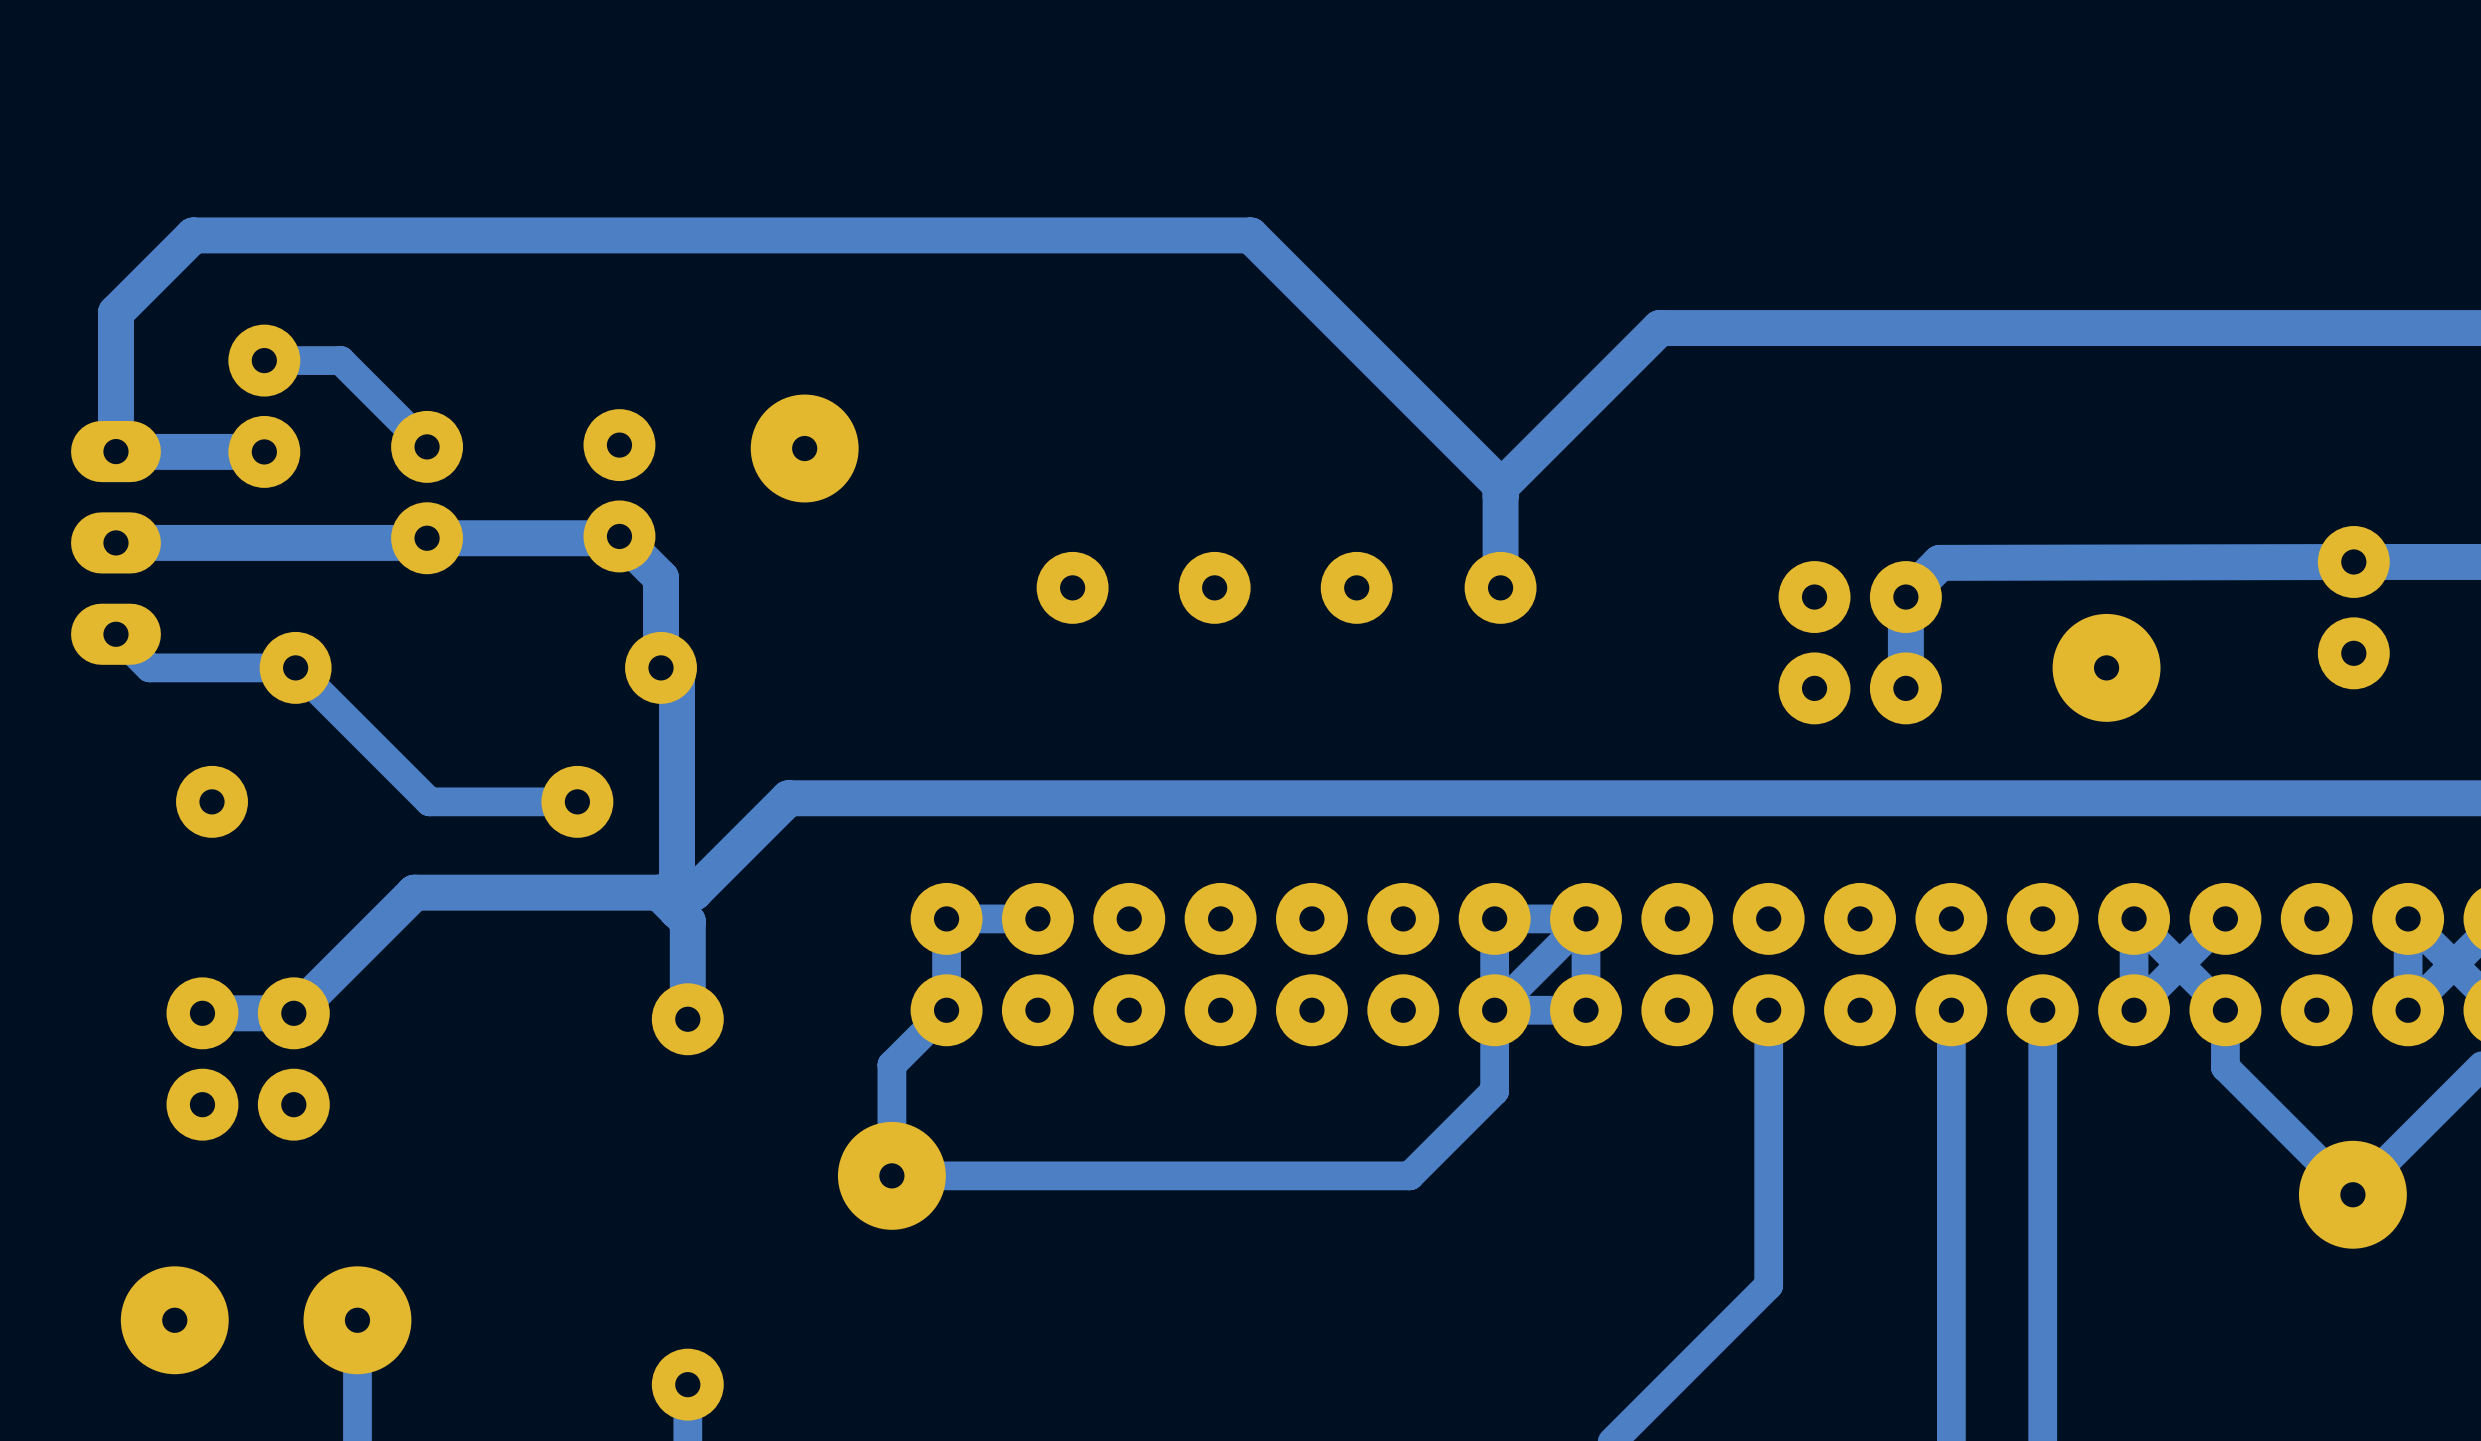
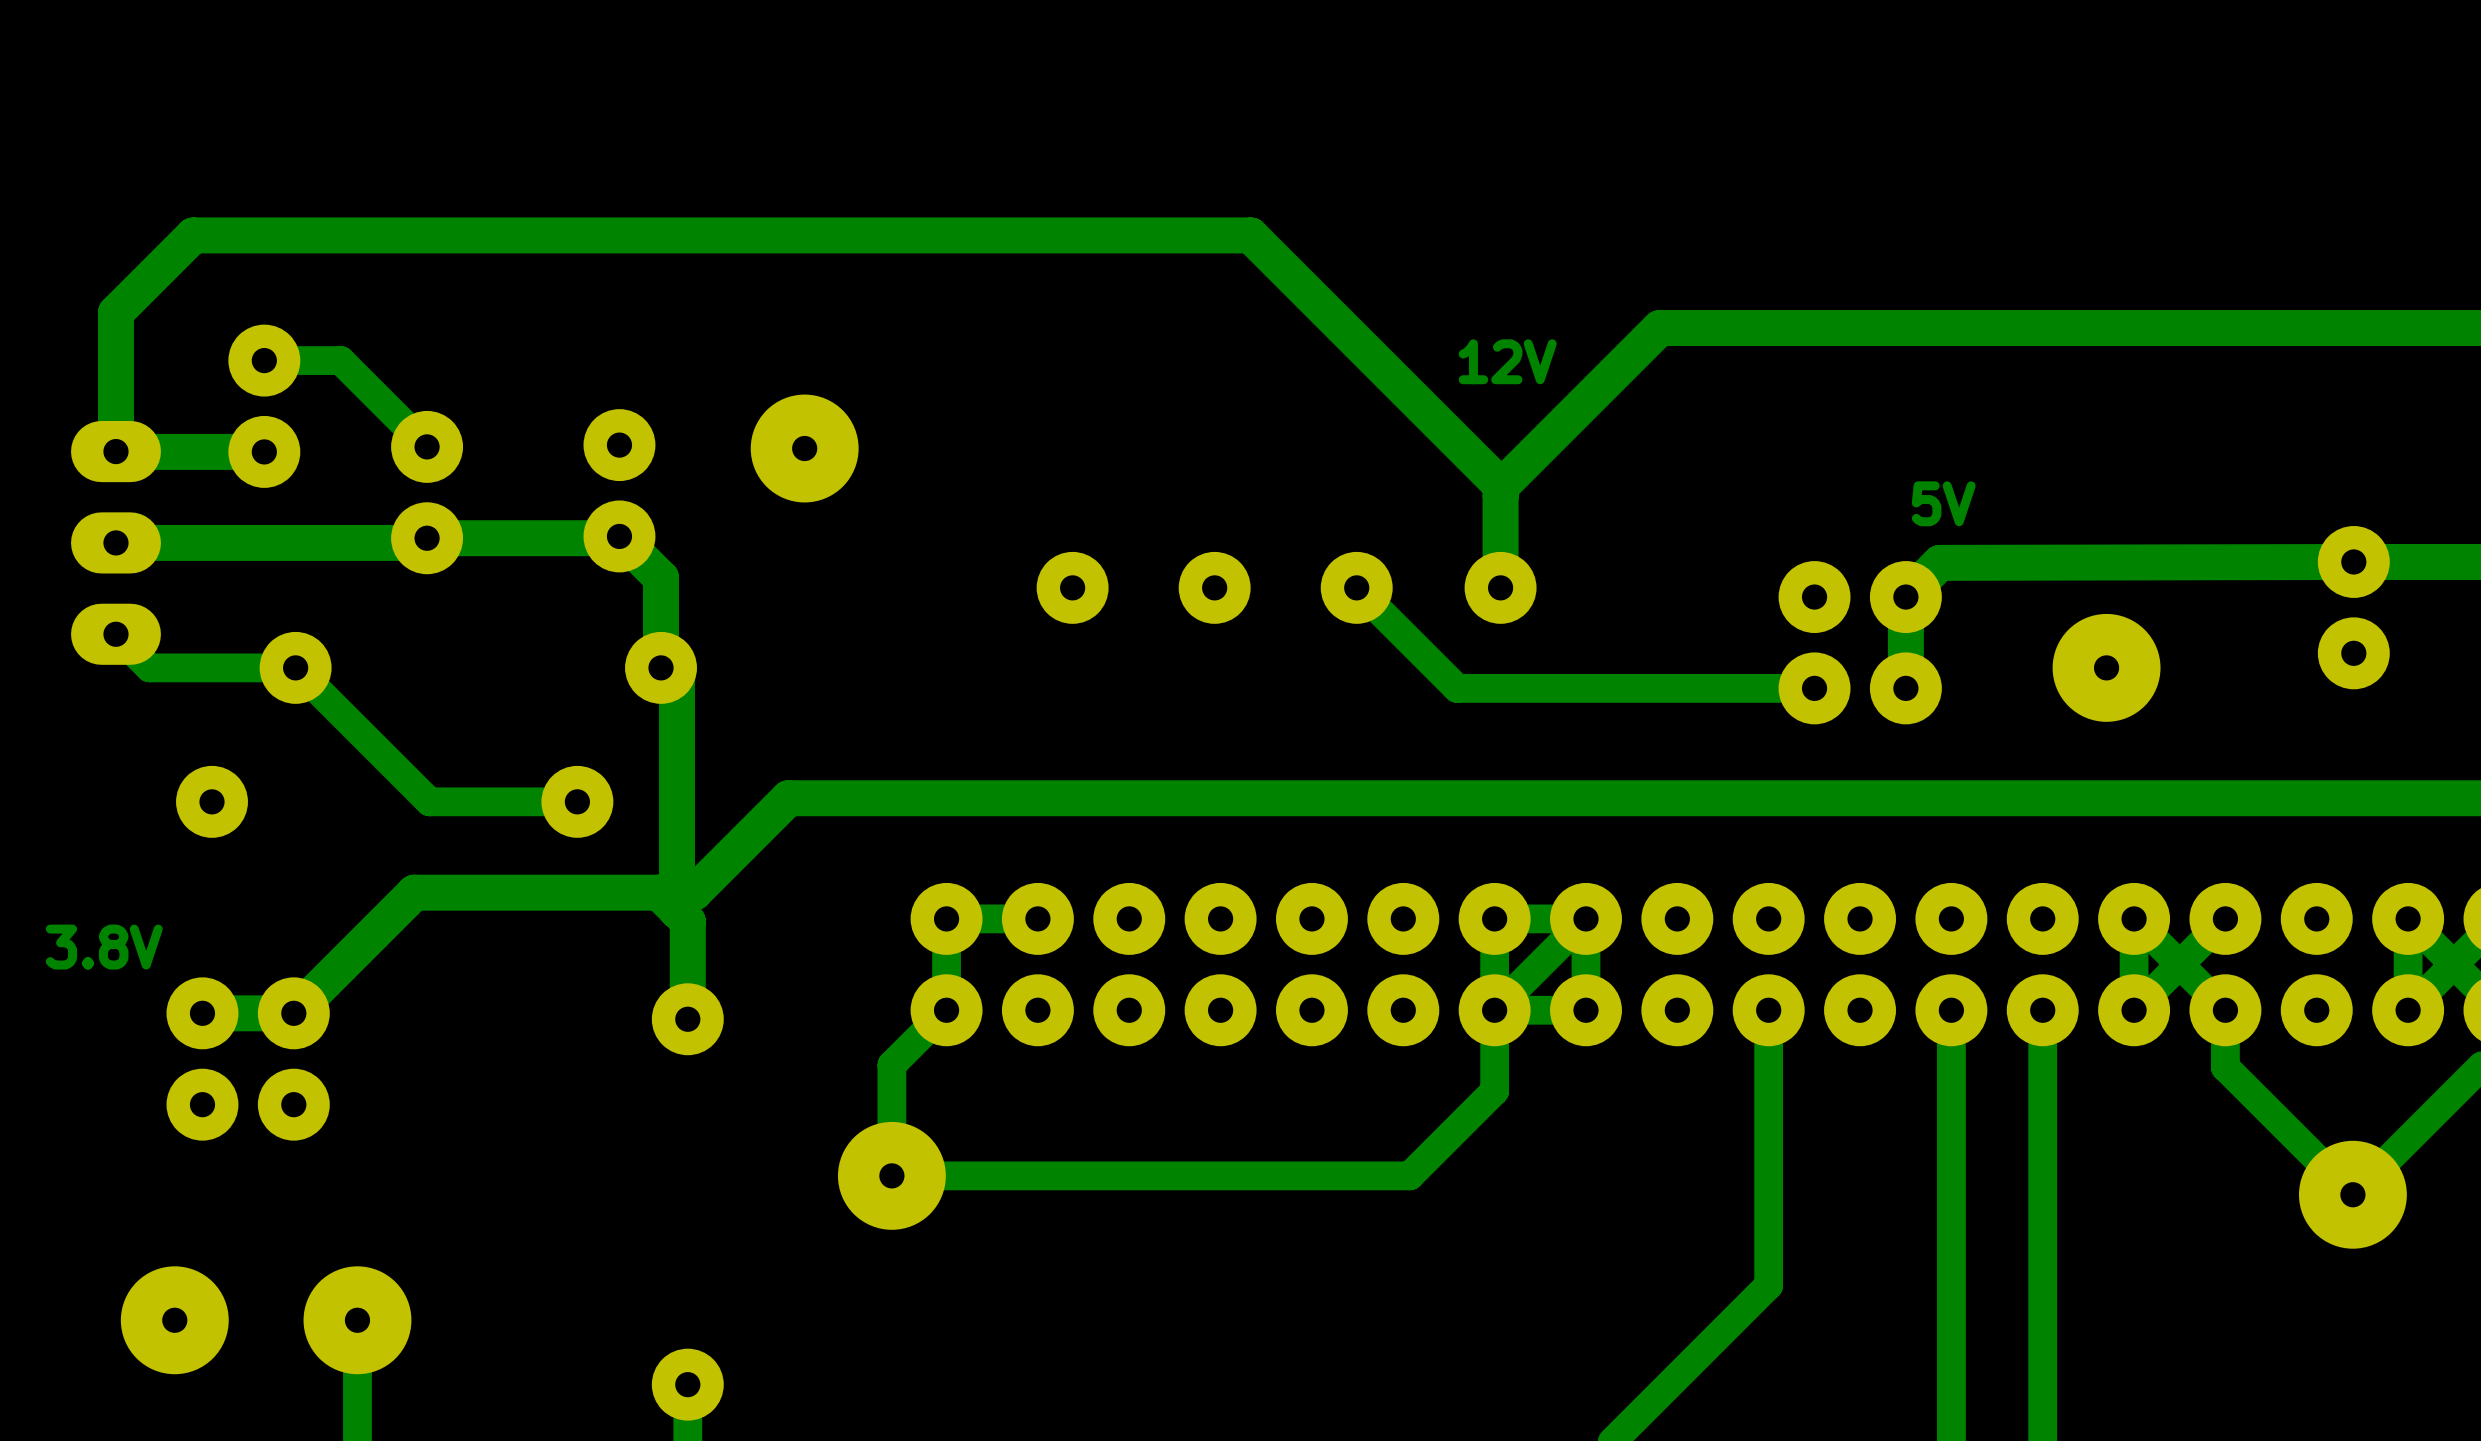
text: none -> 12V (1507, 361)
text: none -> 5V (1943, 503)
track: none -> (1356, 587) (1457, 688) (1814, 688)
text: none -> 3.8V (104, 947)

